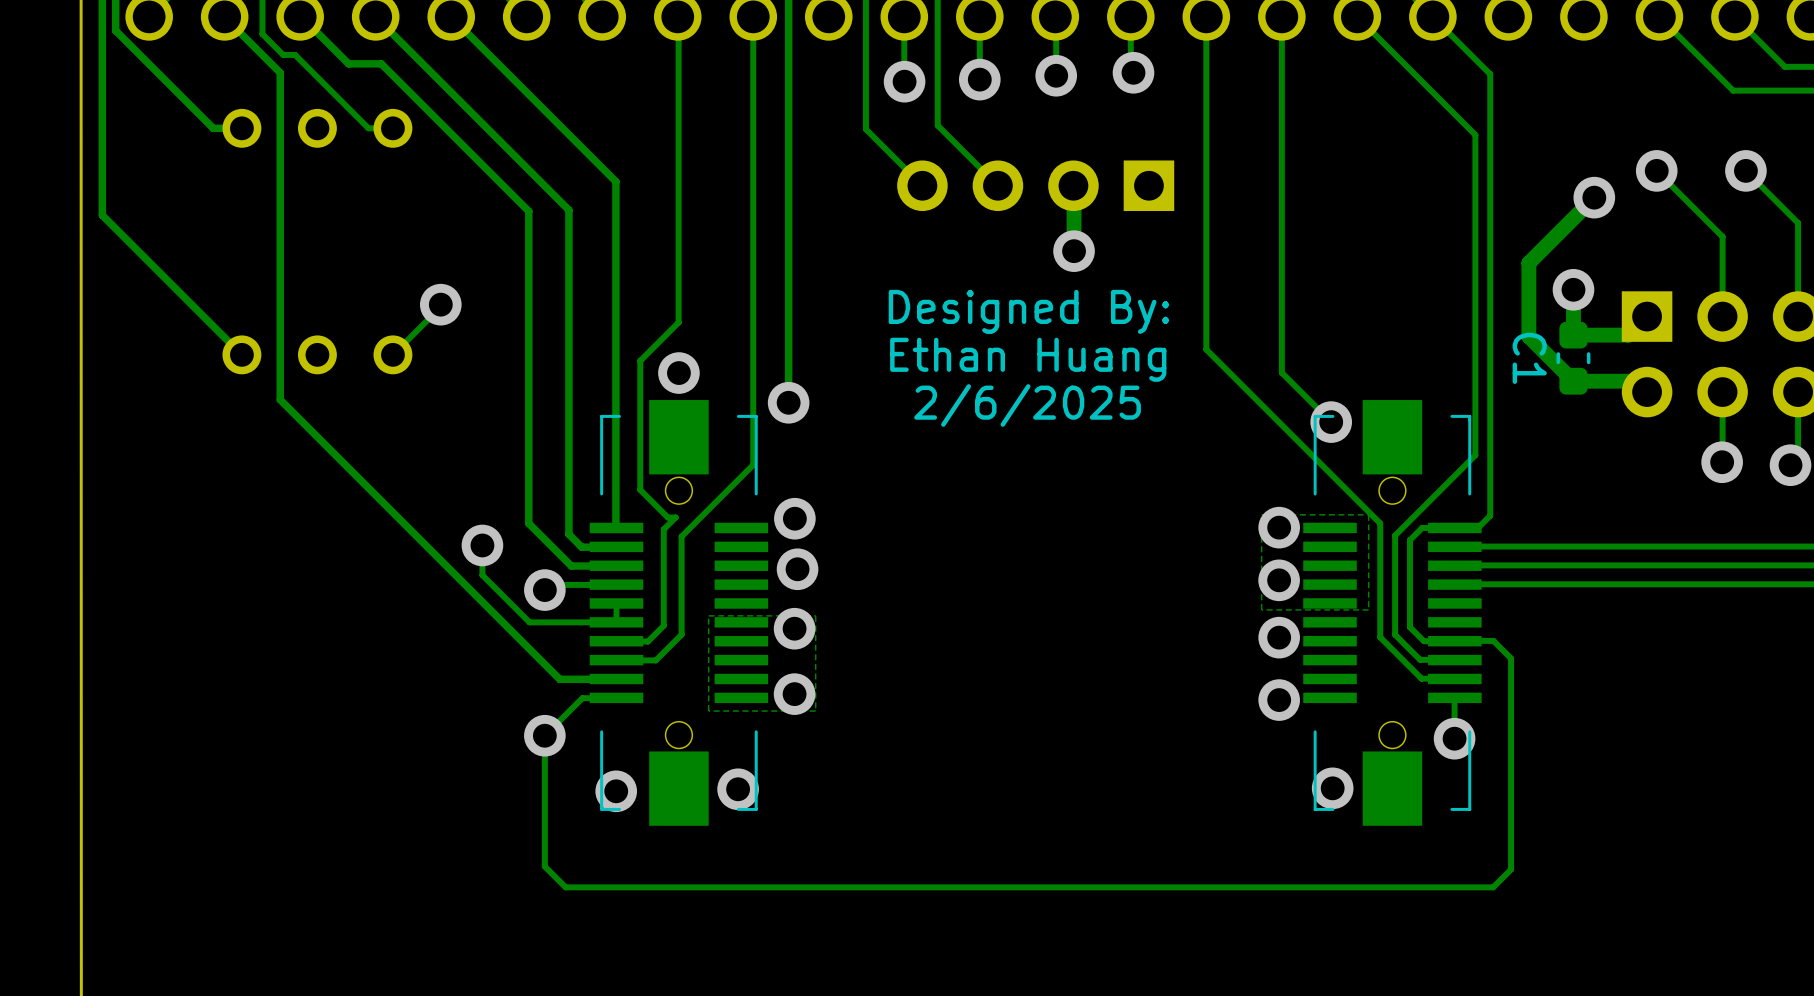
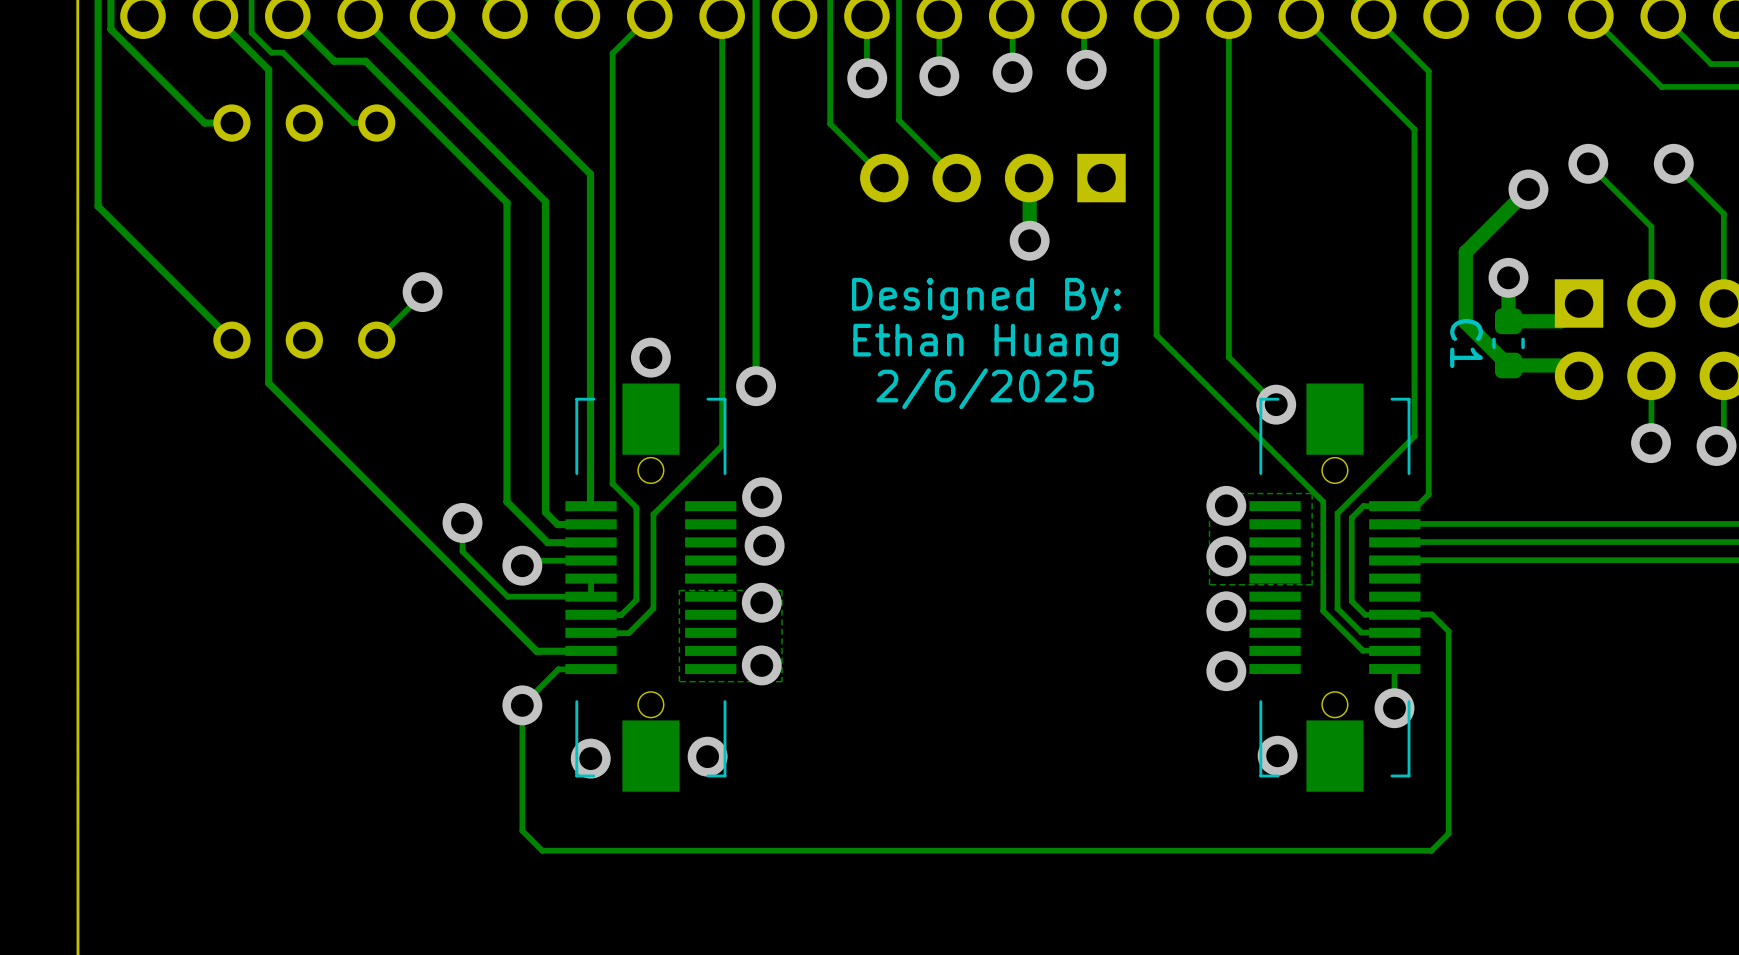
track: (677, 16) (678, 322) (640, 360) (640, 489) (667, 517) (675, 517) (663, 529) -> (649, 16) (612, 53) (612, 483) (636, 507)

